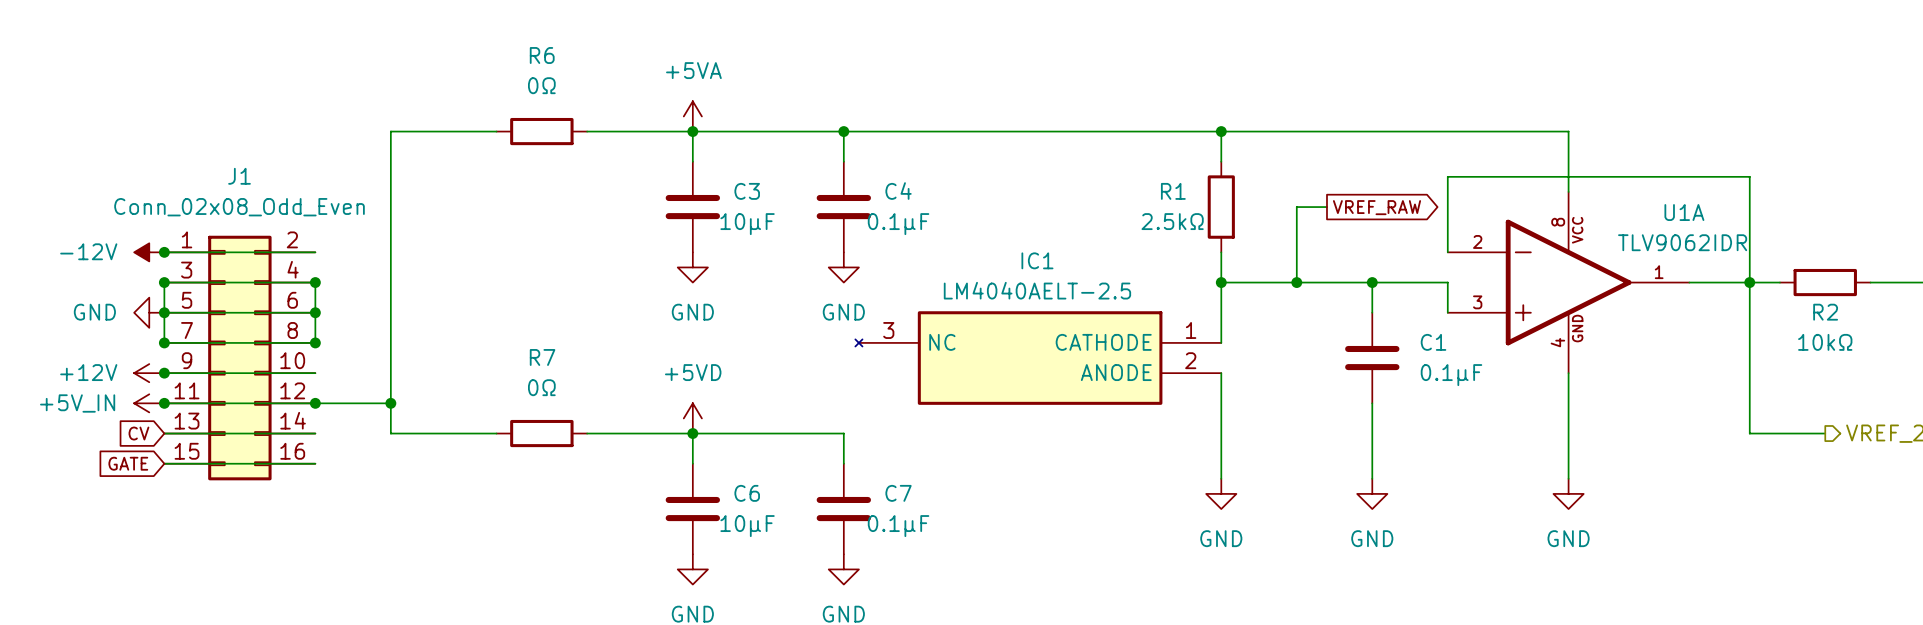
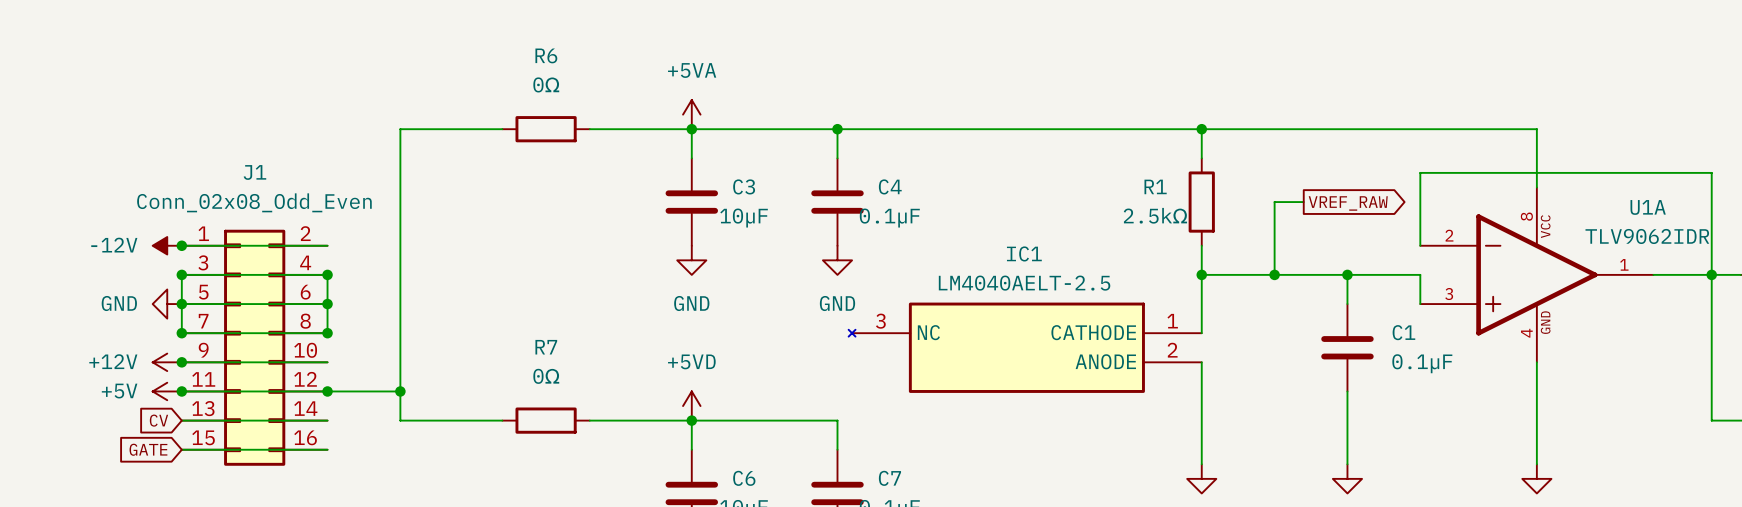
power symbol: +5V_IN (149, 403) -> +5V (167, 391)

